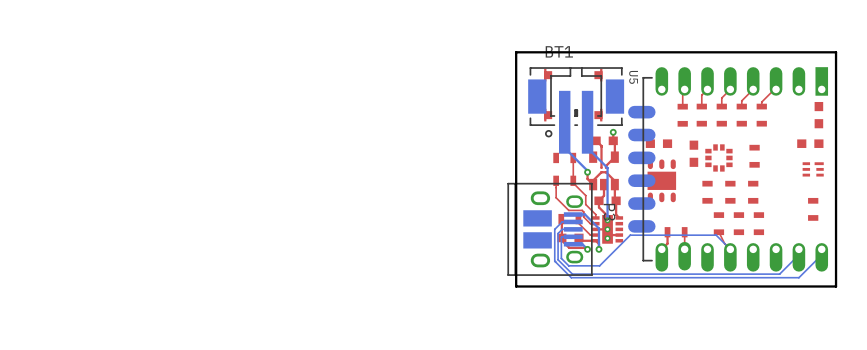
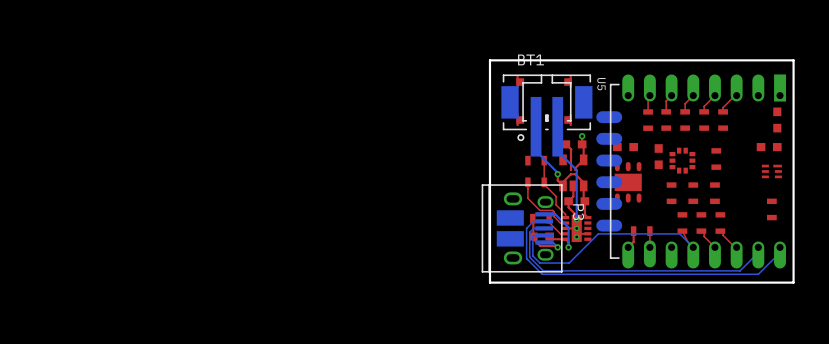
top track: none -> (704, 231) (704, 236) (714, 247)
top track: none -> (723, 231) (723, 235) (735, 247)

